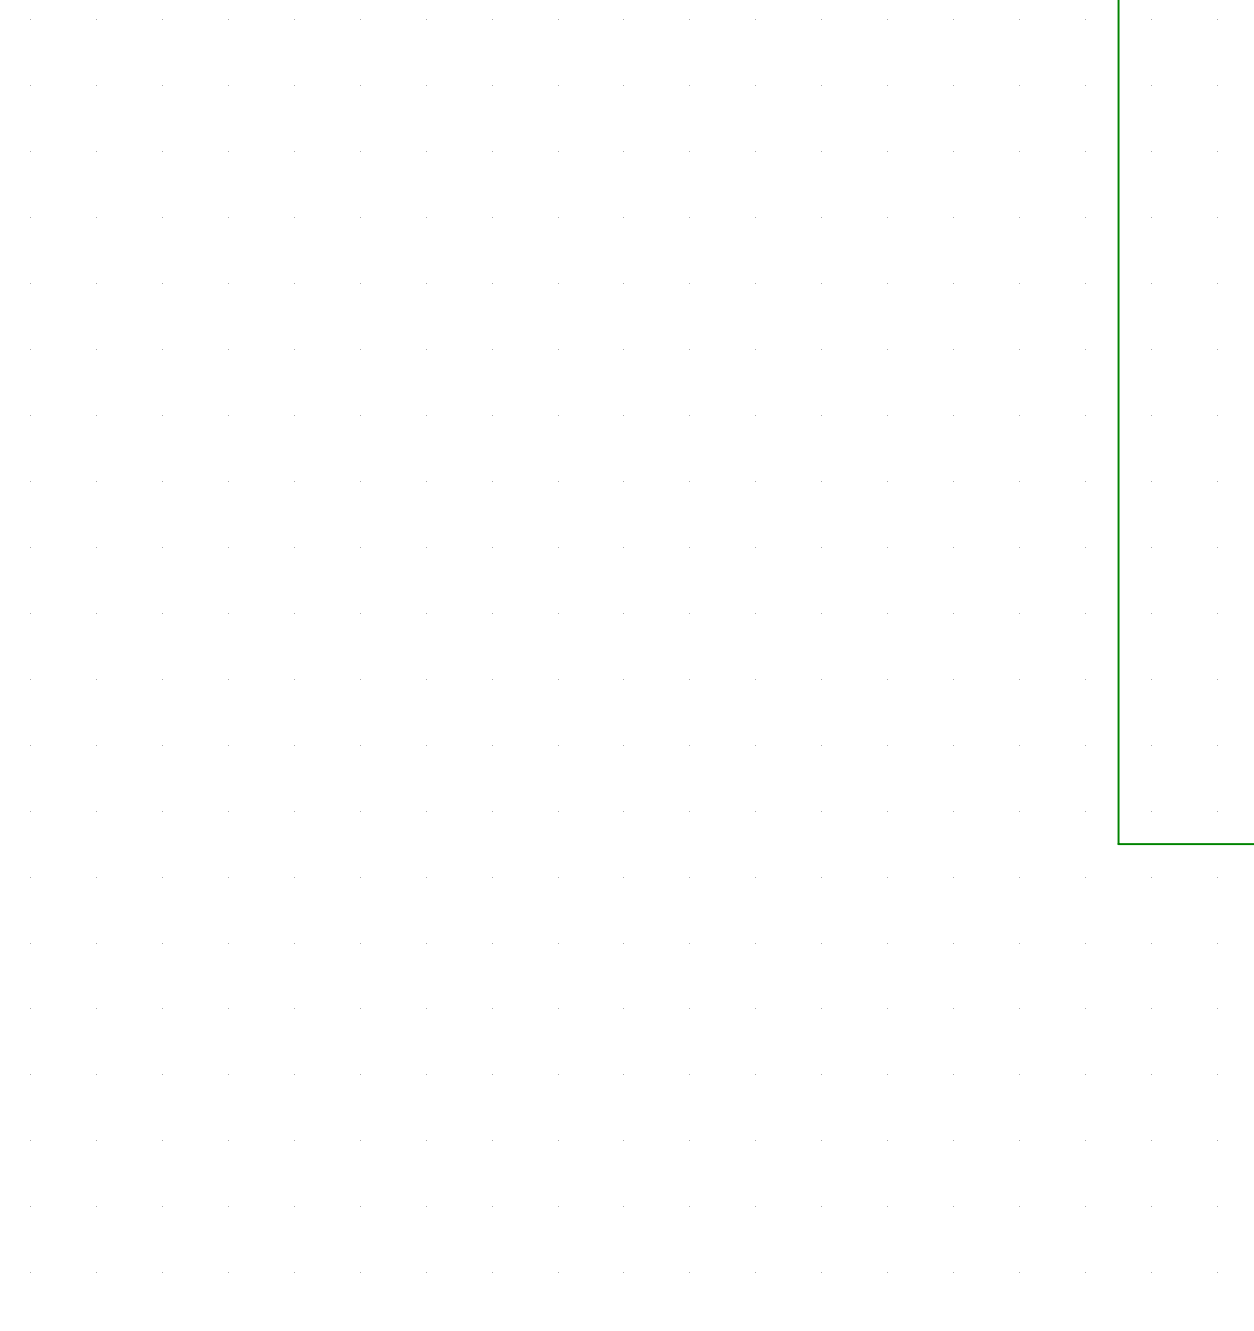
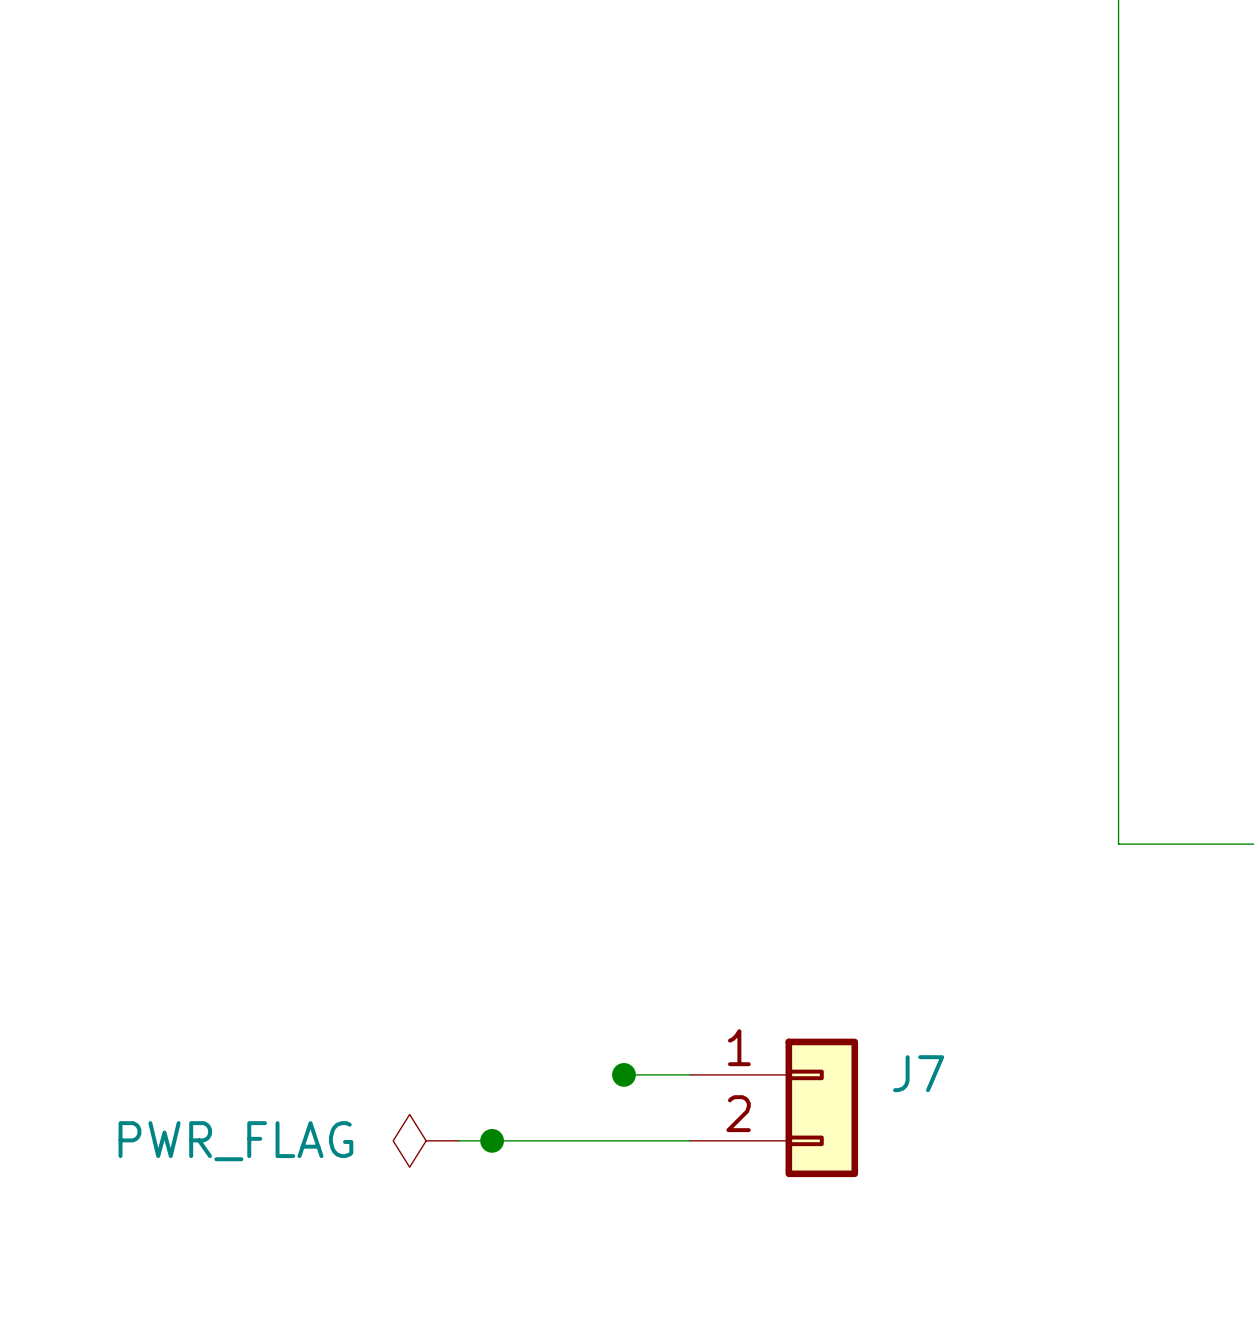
wire: none -> (623, 1074) (689, 1074)
junction: none -> (623, 1074)
J7: none -> (773, 1107)
power symbol: none -> PWR_FLAG (426, 1140)
wire: none -> (459, 1140) (689, 1140)
junction: none -> (492, 1140)

